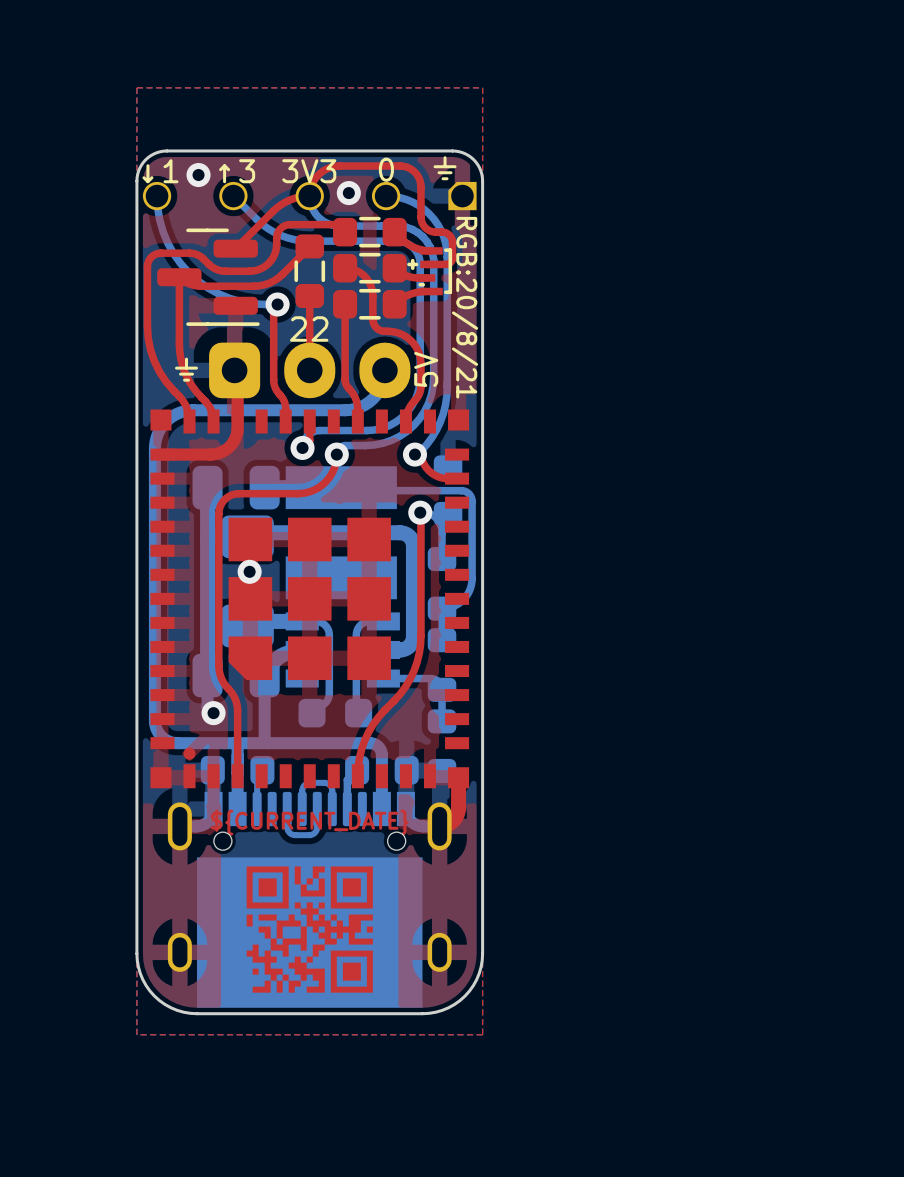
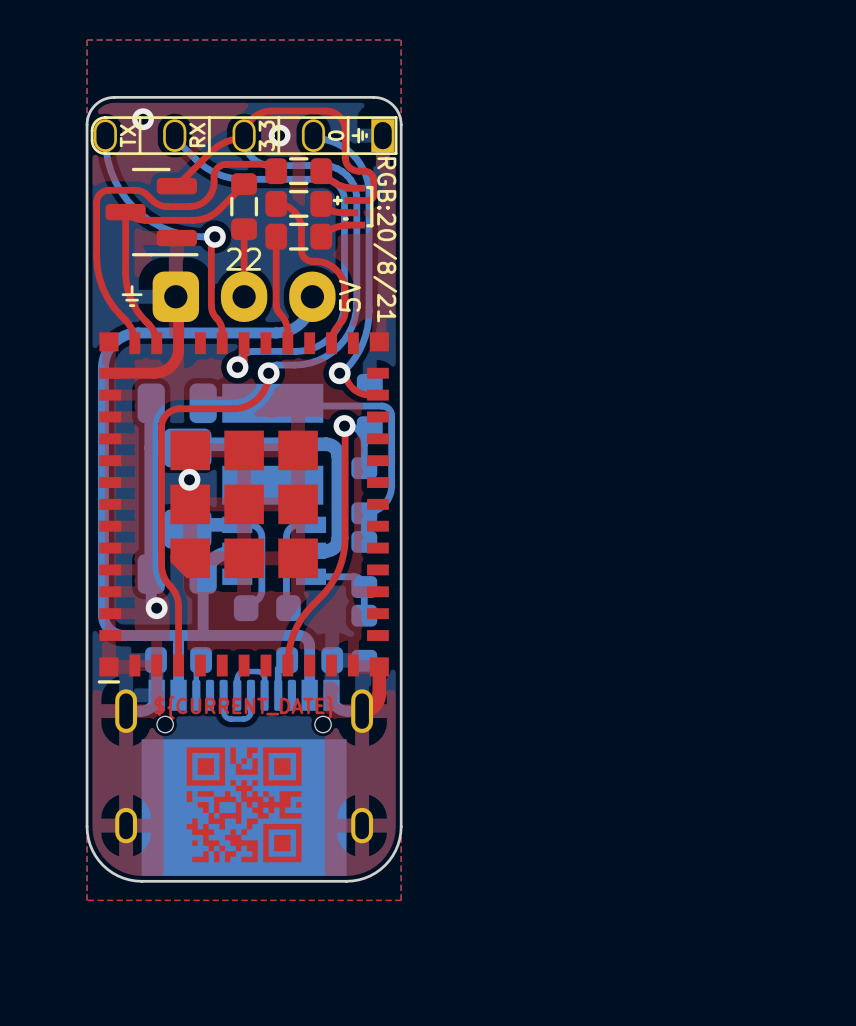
part footprint: [142, 181, 477, 211] -> [90, 116, 398, 156]
part footprint: [150, 409, 470, 789] -> [97, 332, 389, 684]

